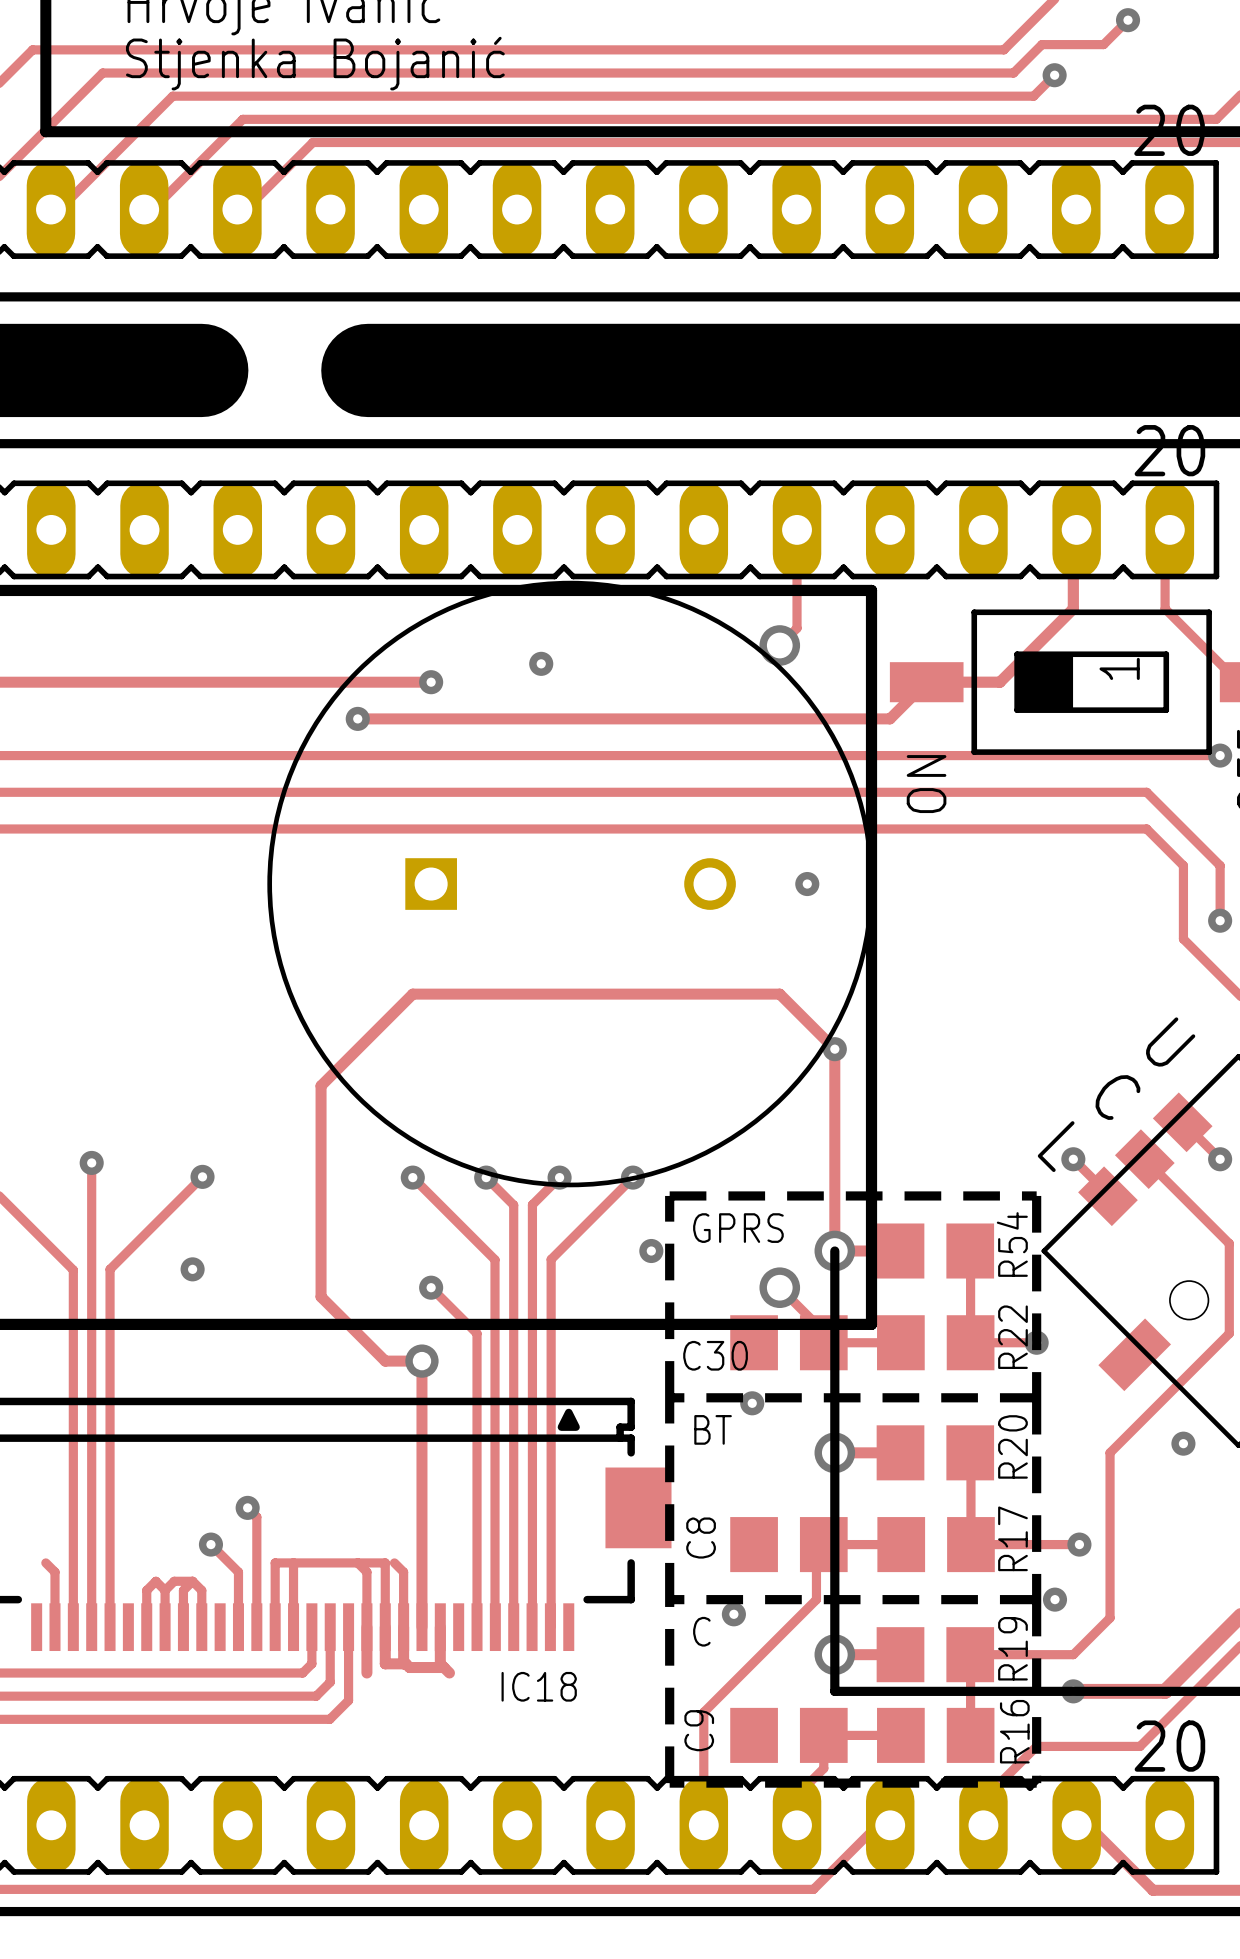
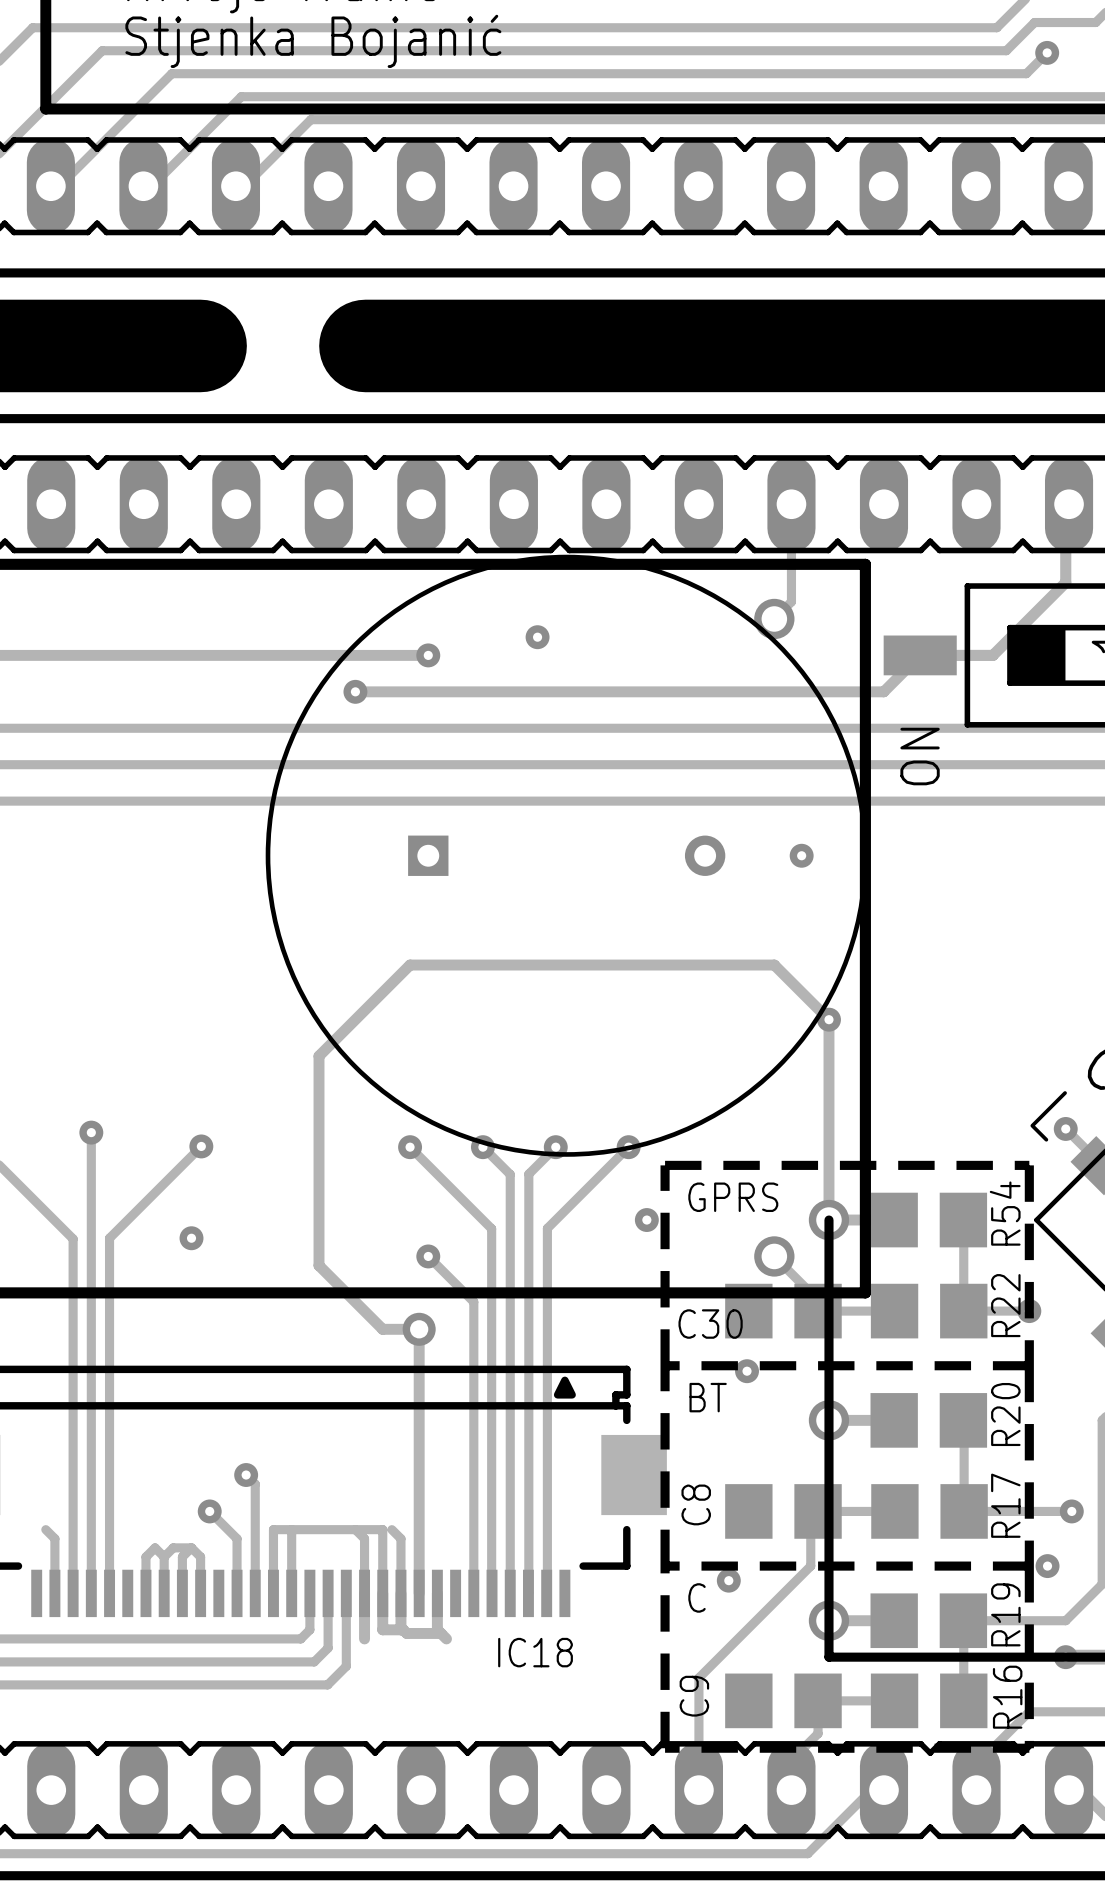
part footprint: [267, 580, 874, 1188] -> [265, 554, 868, 1157]

